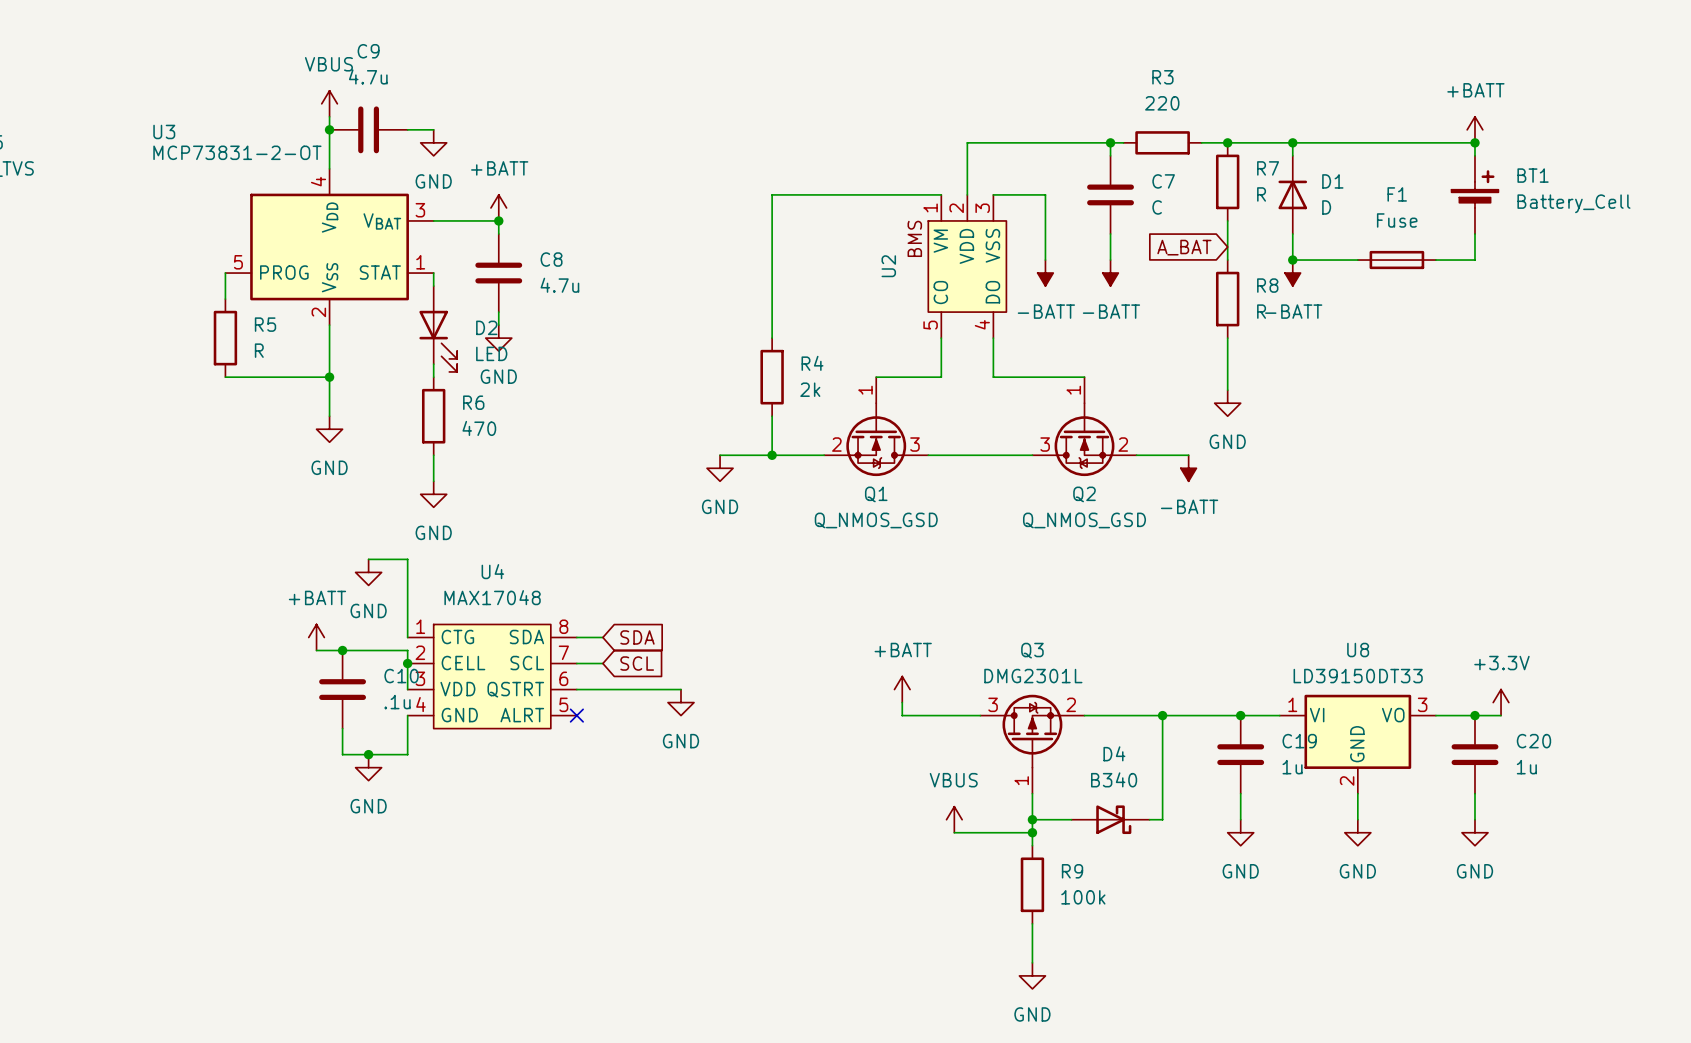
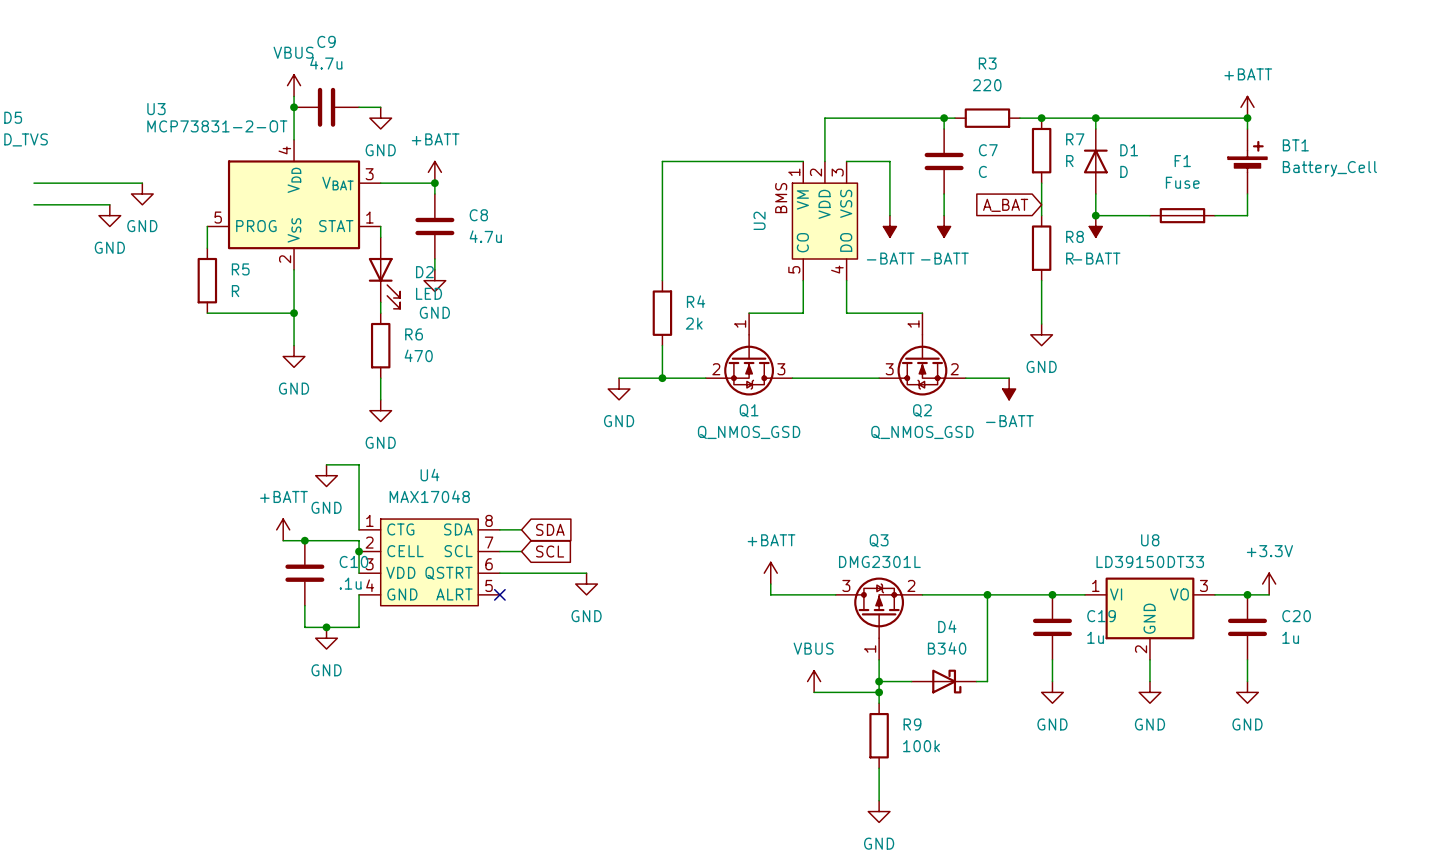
wire: none -> (33, 183) (142, 183)
power symbol: none -> GND (142, 193)
wire: none -> (33, 204) (109, 204)
power symbol: none -> GND (109, 215)

